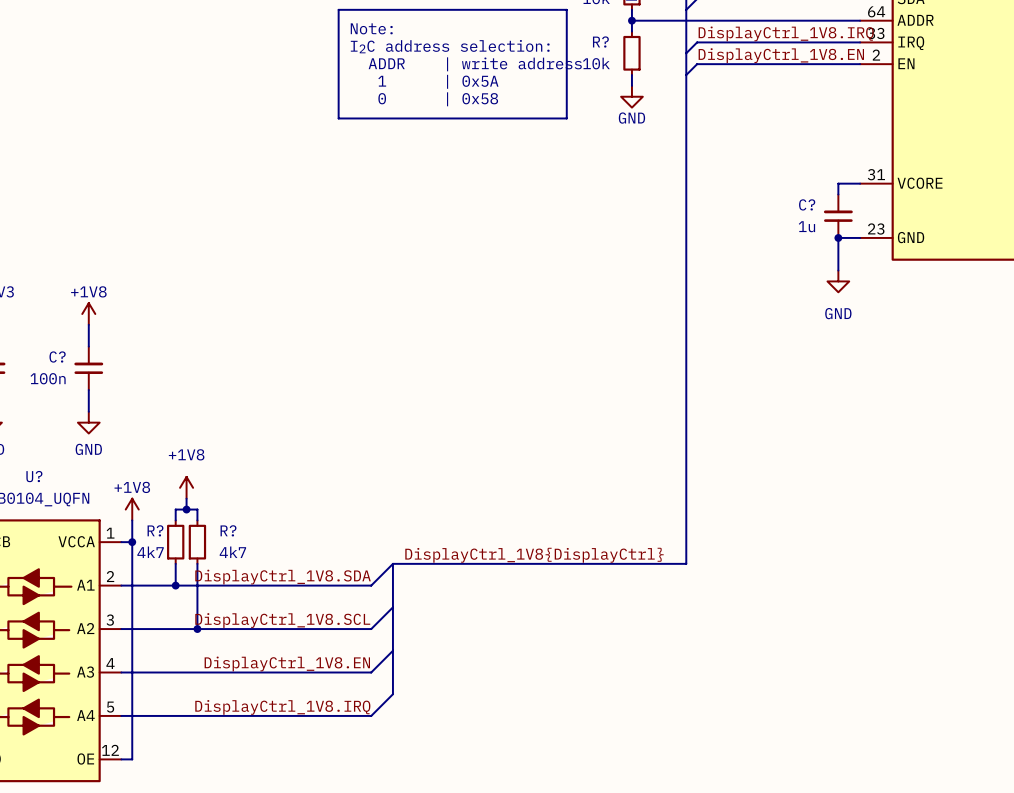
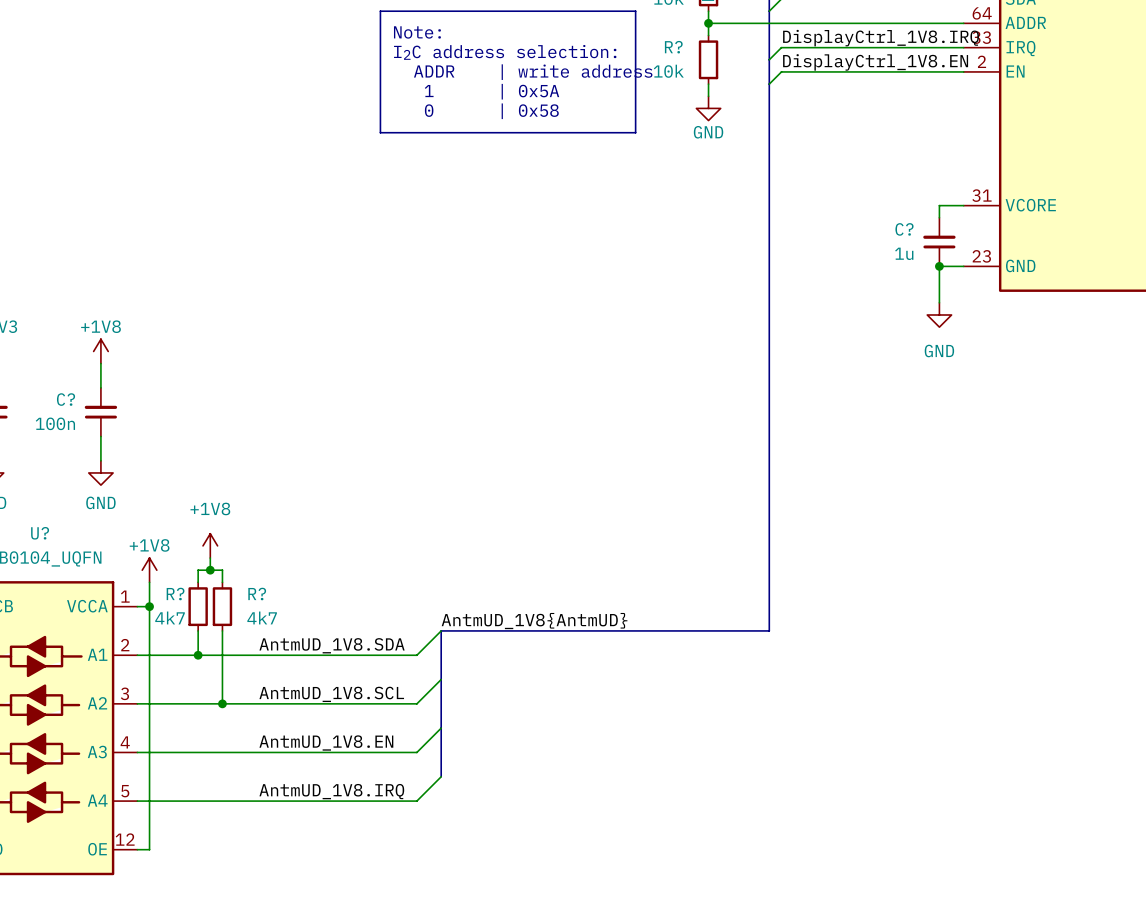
label: none -> AntmUD_1V8{AntmUD} (534, 621)
label: DisplayCtrl_1V8{DisplayCtrl} (534, 555) -> none
label: DisplayCtrl_1V8.SDA (283, 577) -> none
label: none -> AntmUD_1V8.SDA (332, 645)
label: DisplayCtrl_1V8.SCL (282, 620) -> none
label: none -> AntmUD_1V8.SCL (331, 694)
label: DisplayCtrl_1V8.EN (287, 663) -> none
label: none -> AntmUD_1V8.EN (326, 742)
label: DisplayCtrl_1V8.IRQ (282, 707) -> none
label: none -> AntmUD_1V8.IRQ (331, 791)

